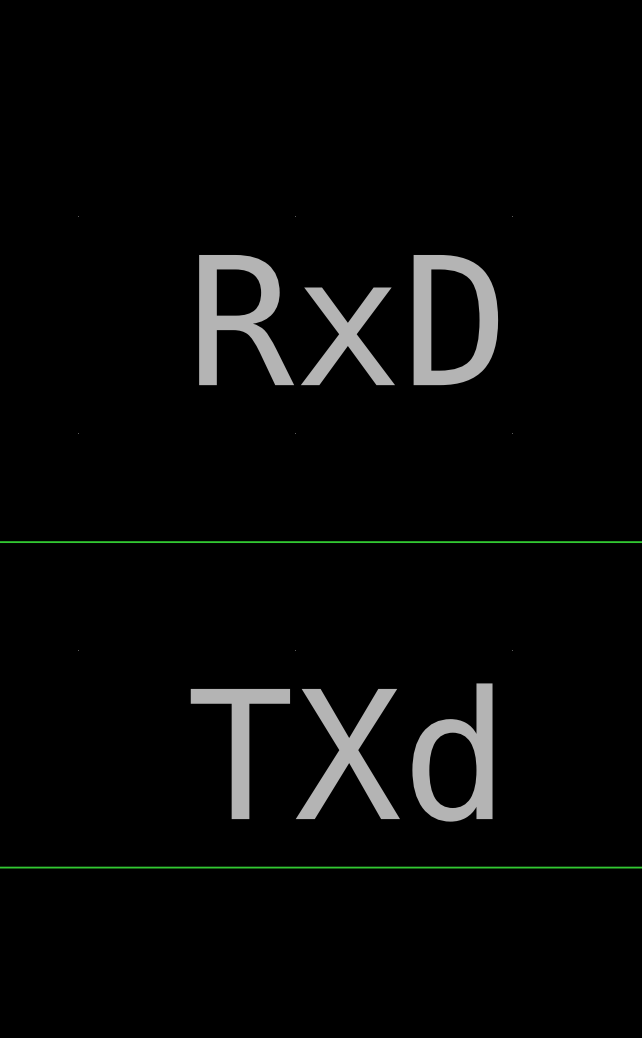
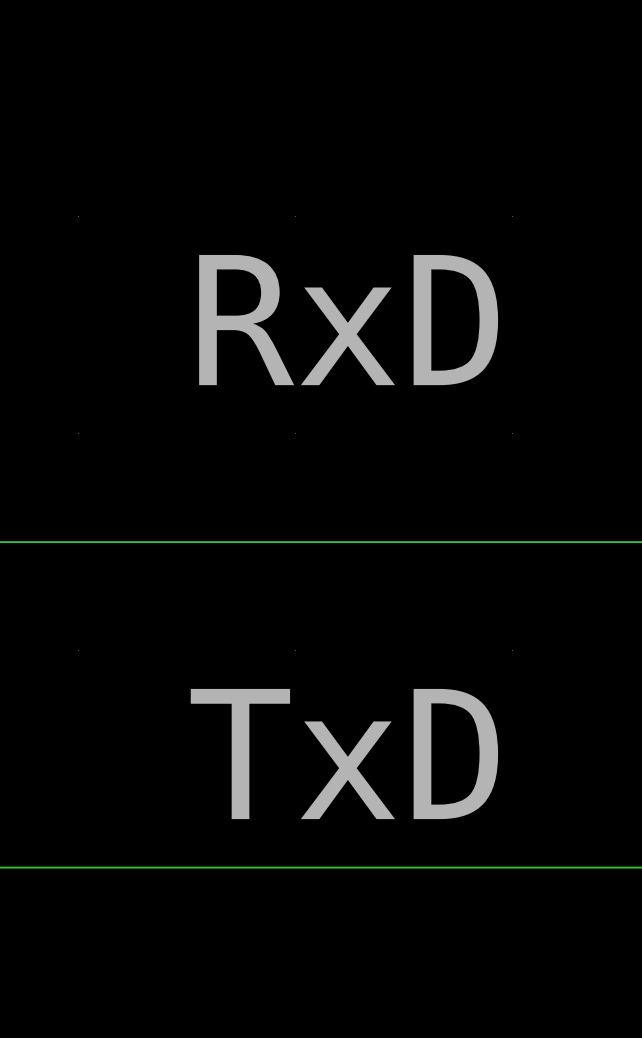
label: TXd (341, 752) -> TxD (344, 754)

